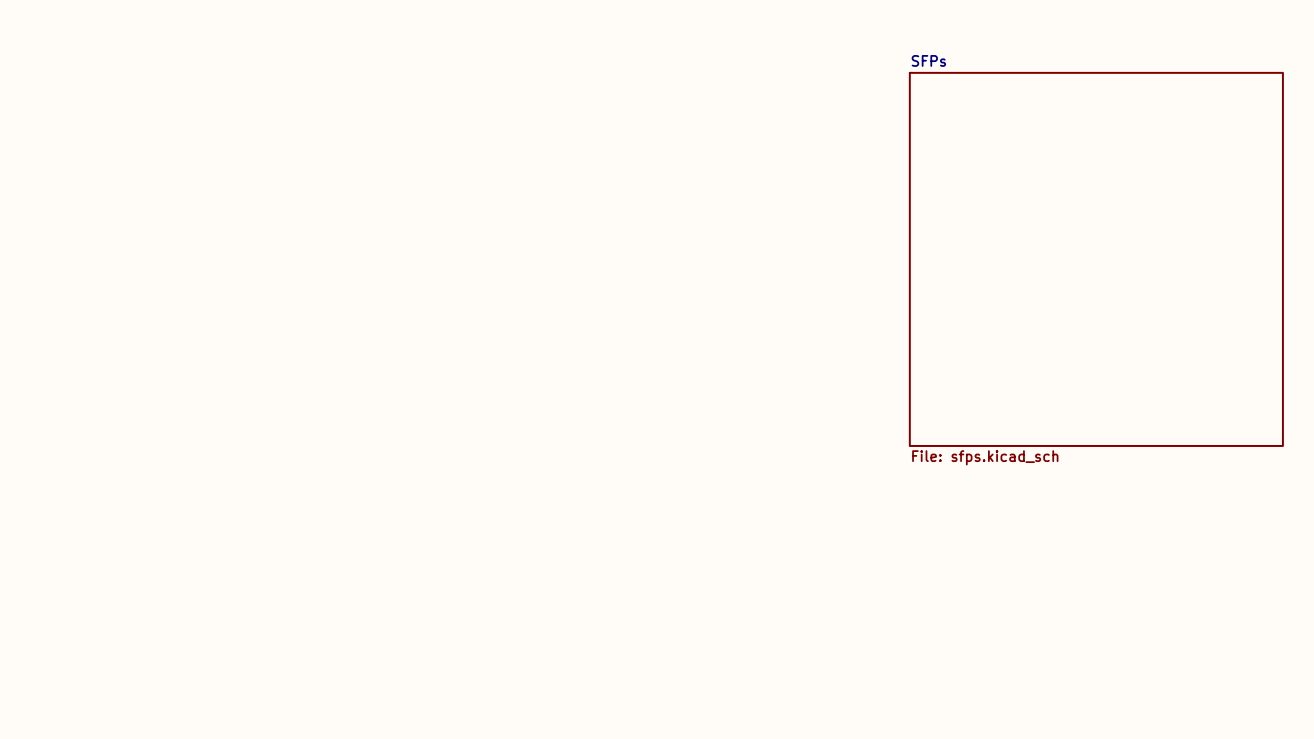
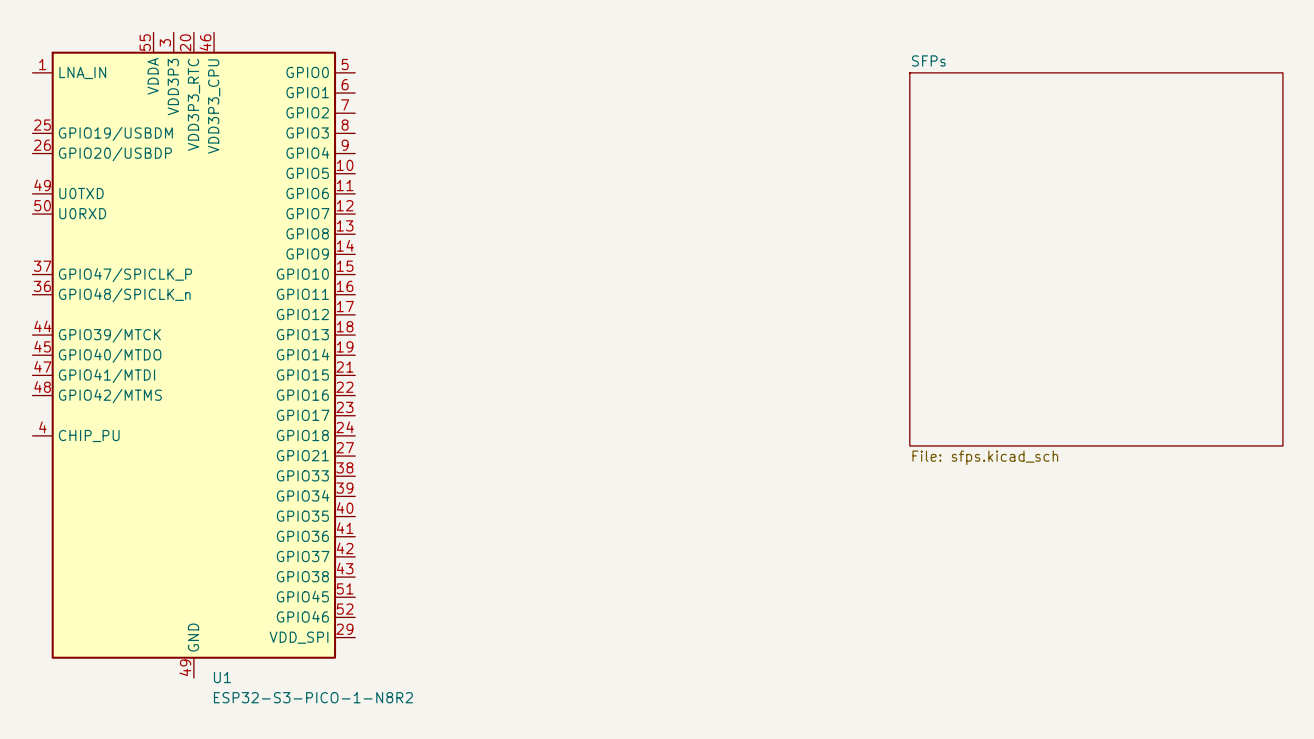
U1: none -> ESP32-S3-PICO-1-N8R2 (193, 355)

